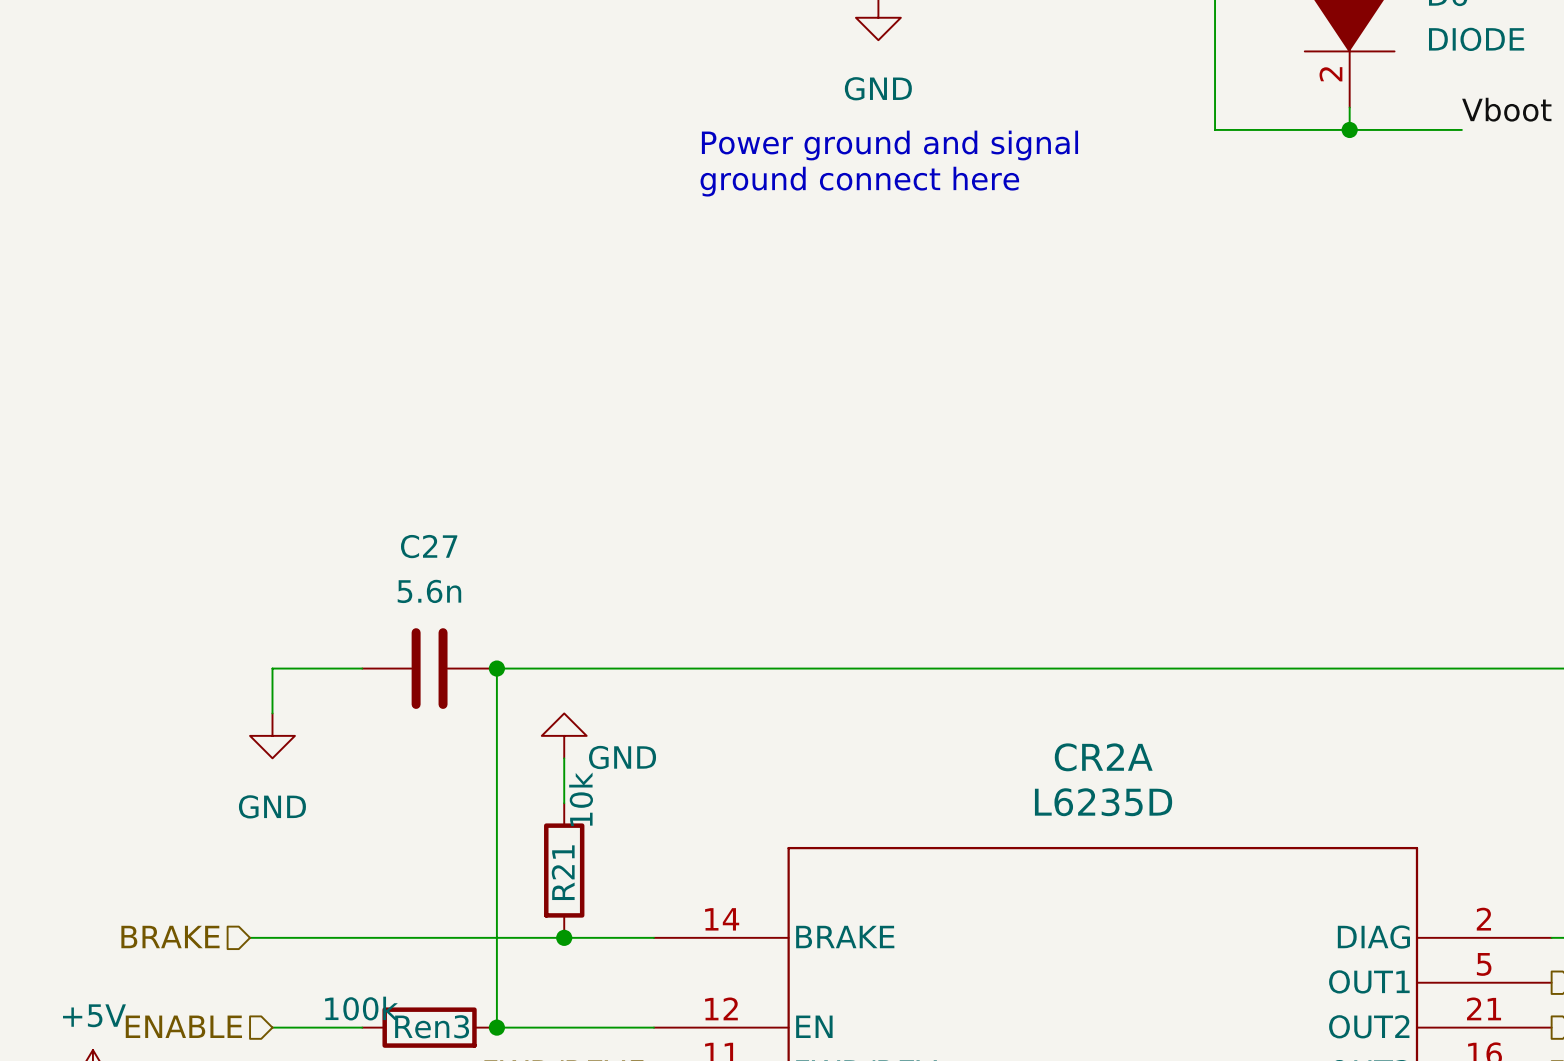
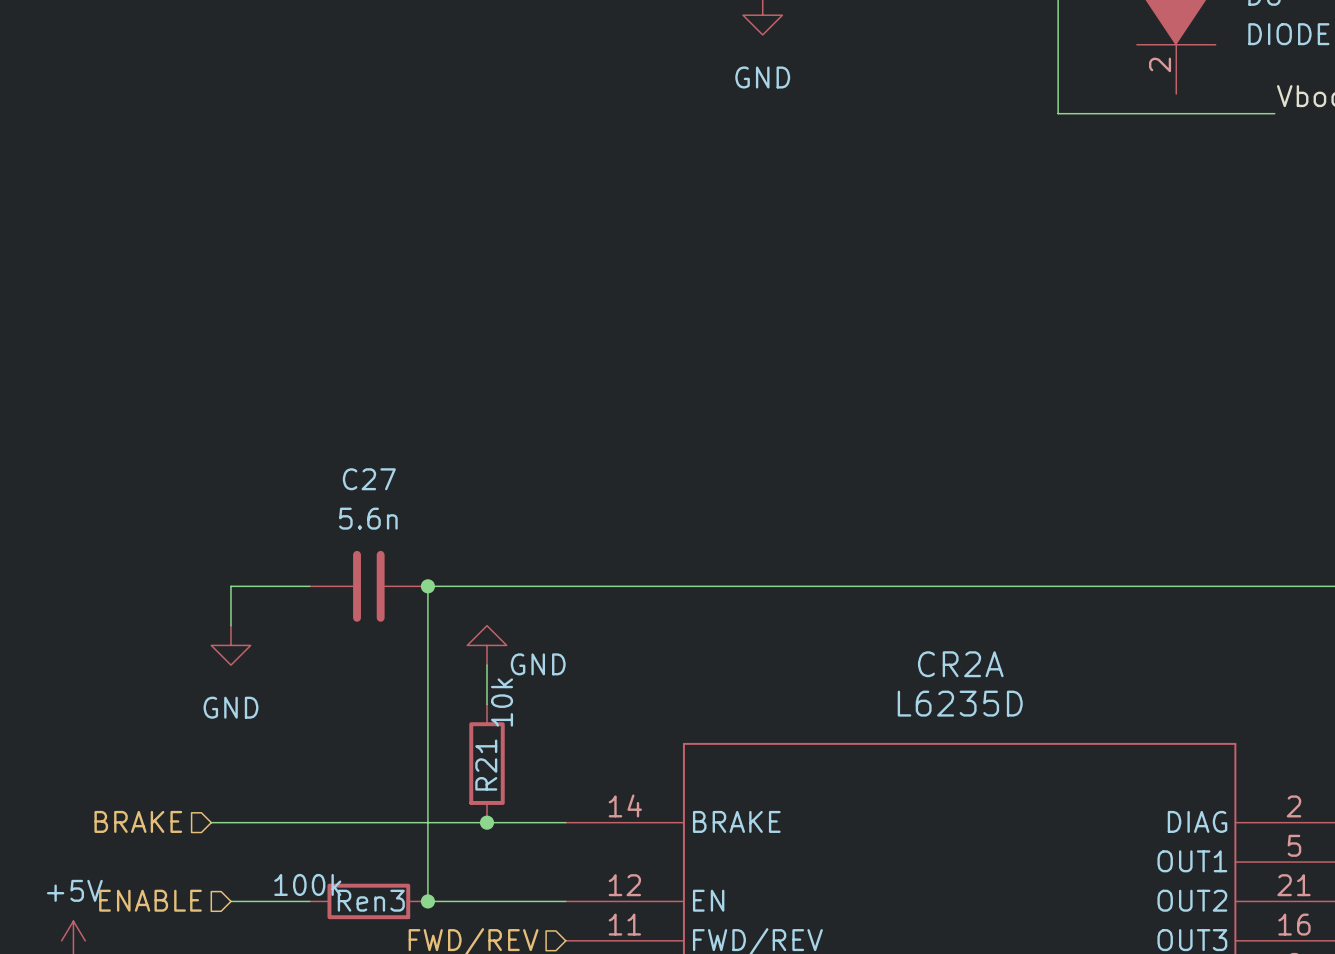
wire: (1349, 107) (1349, 129) -> none
junction: (1349, 129) -> none
text: Power ground and signal (889, 145) -> none
text: ground connect here (859, 181) -> none

